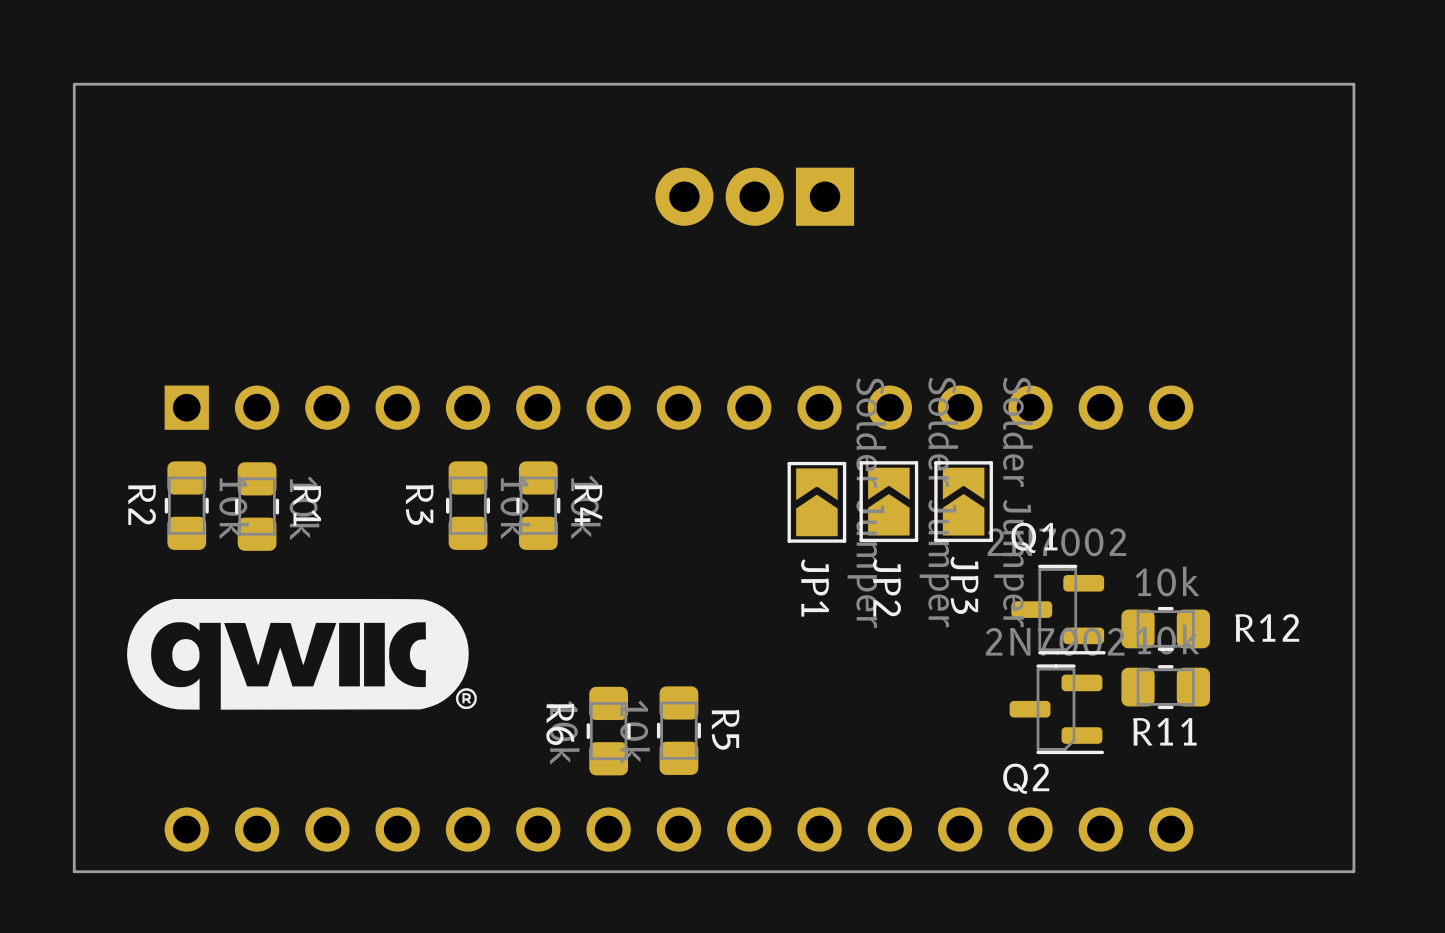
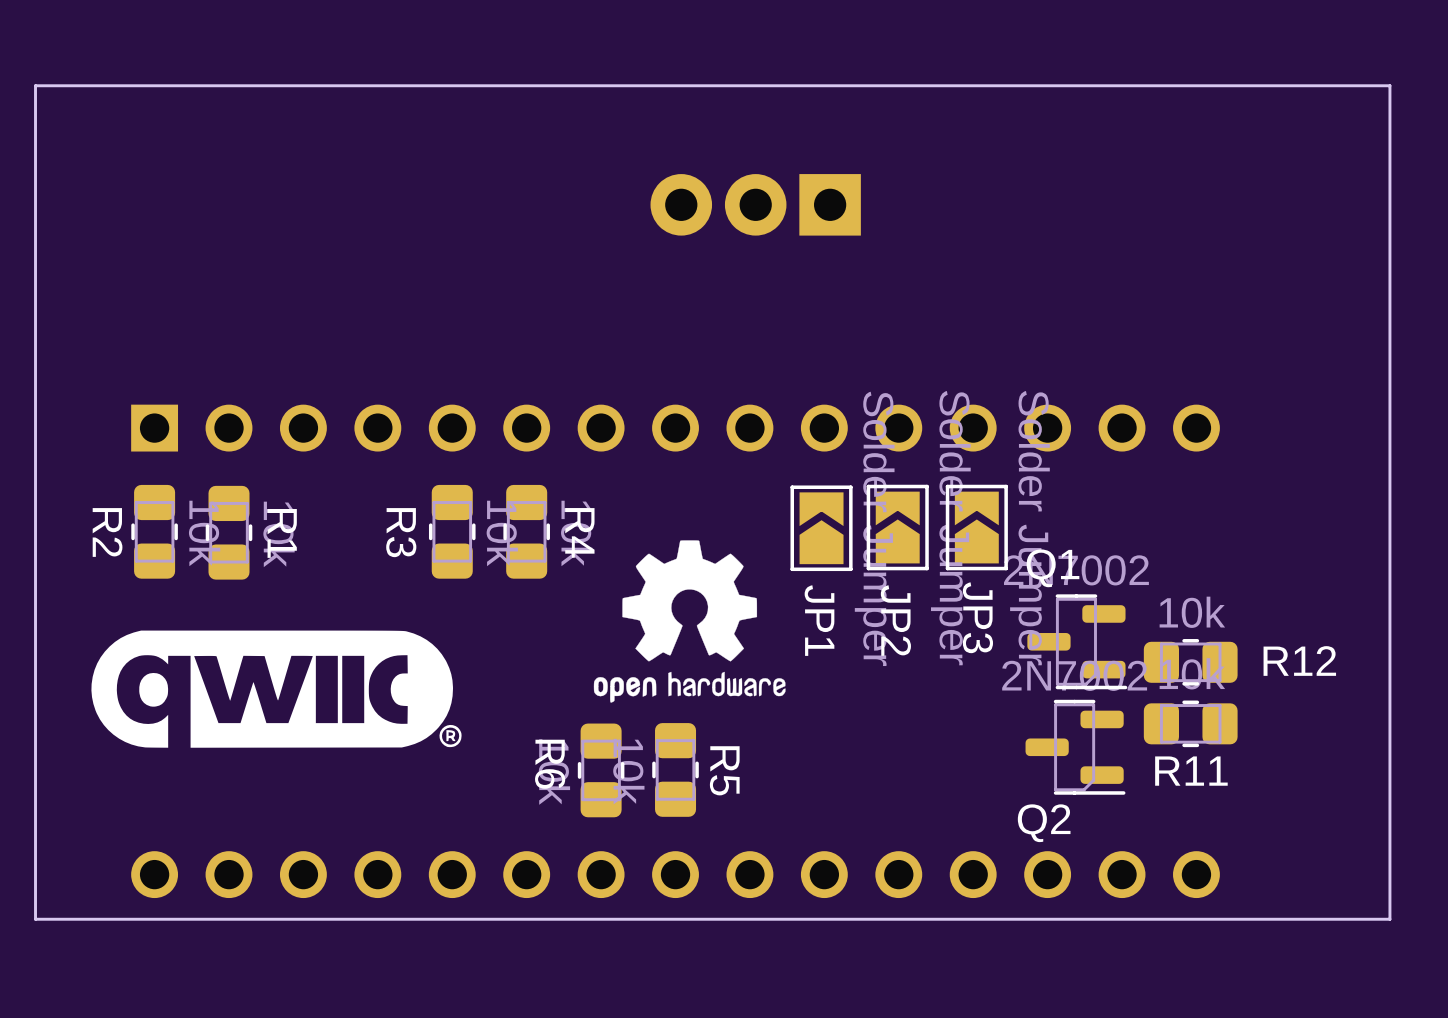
drawing: none -> [593, 540, 786, 703]

